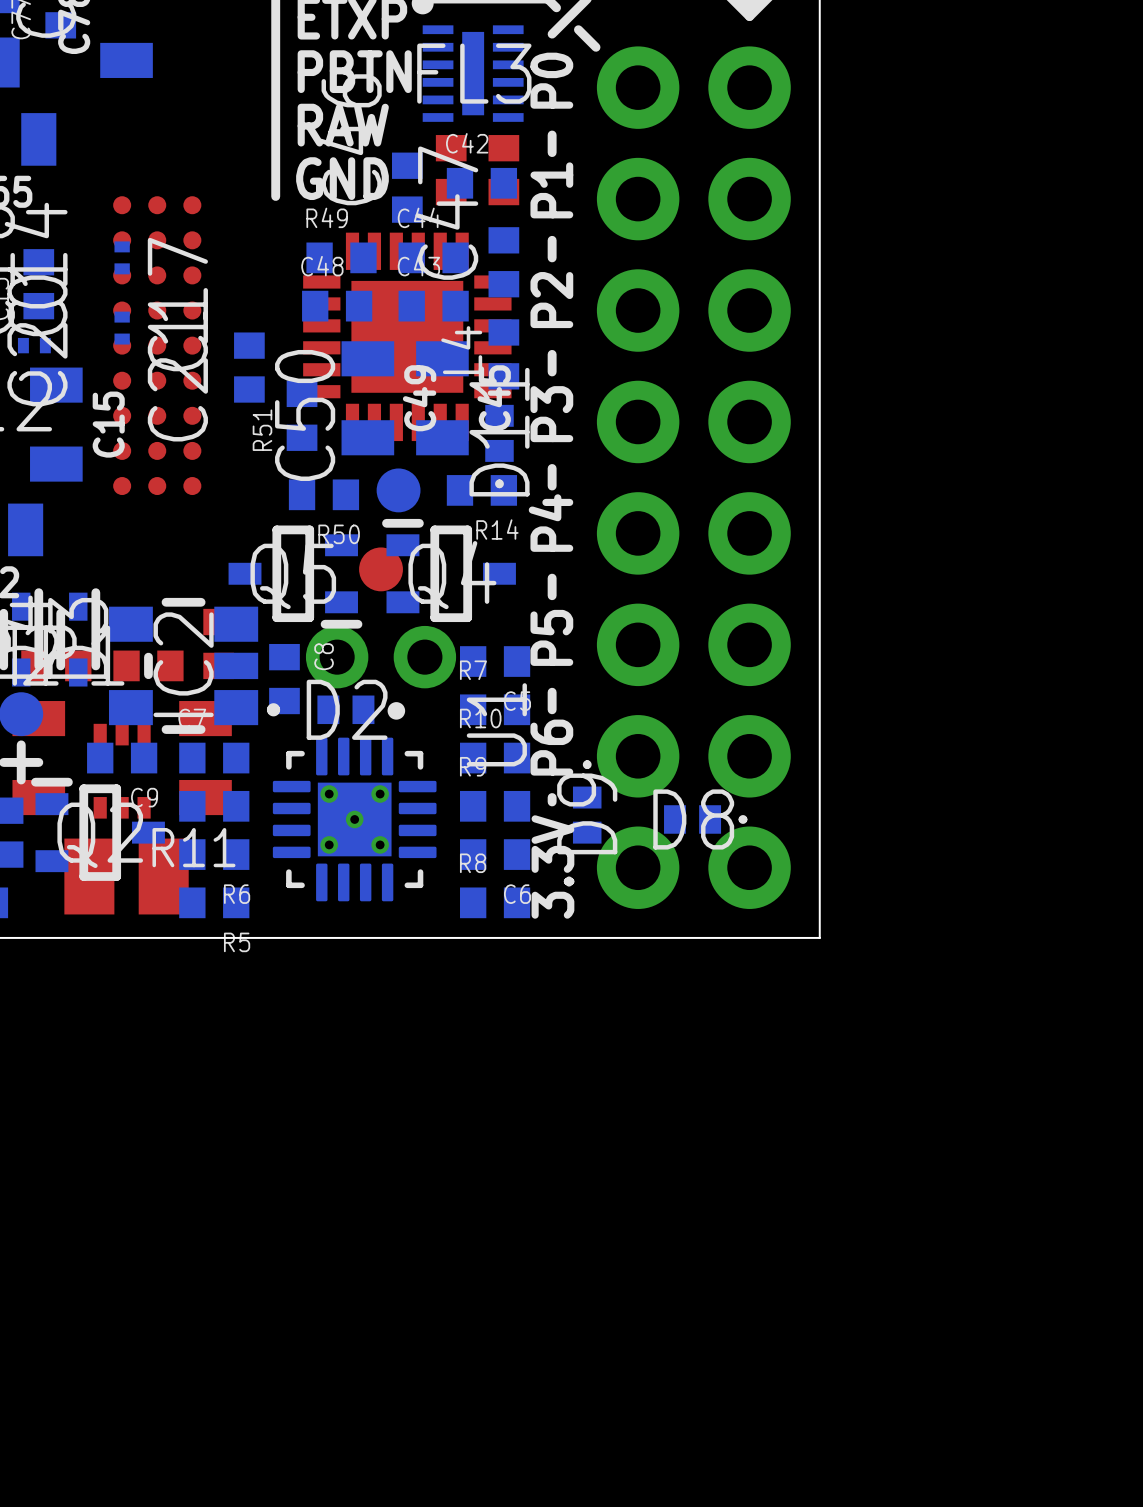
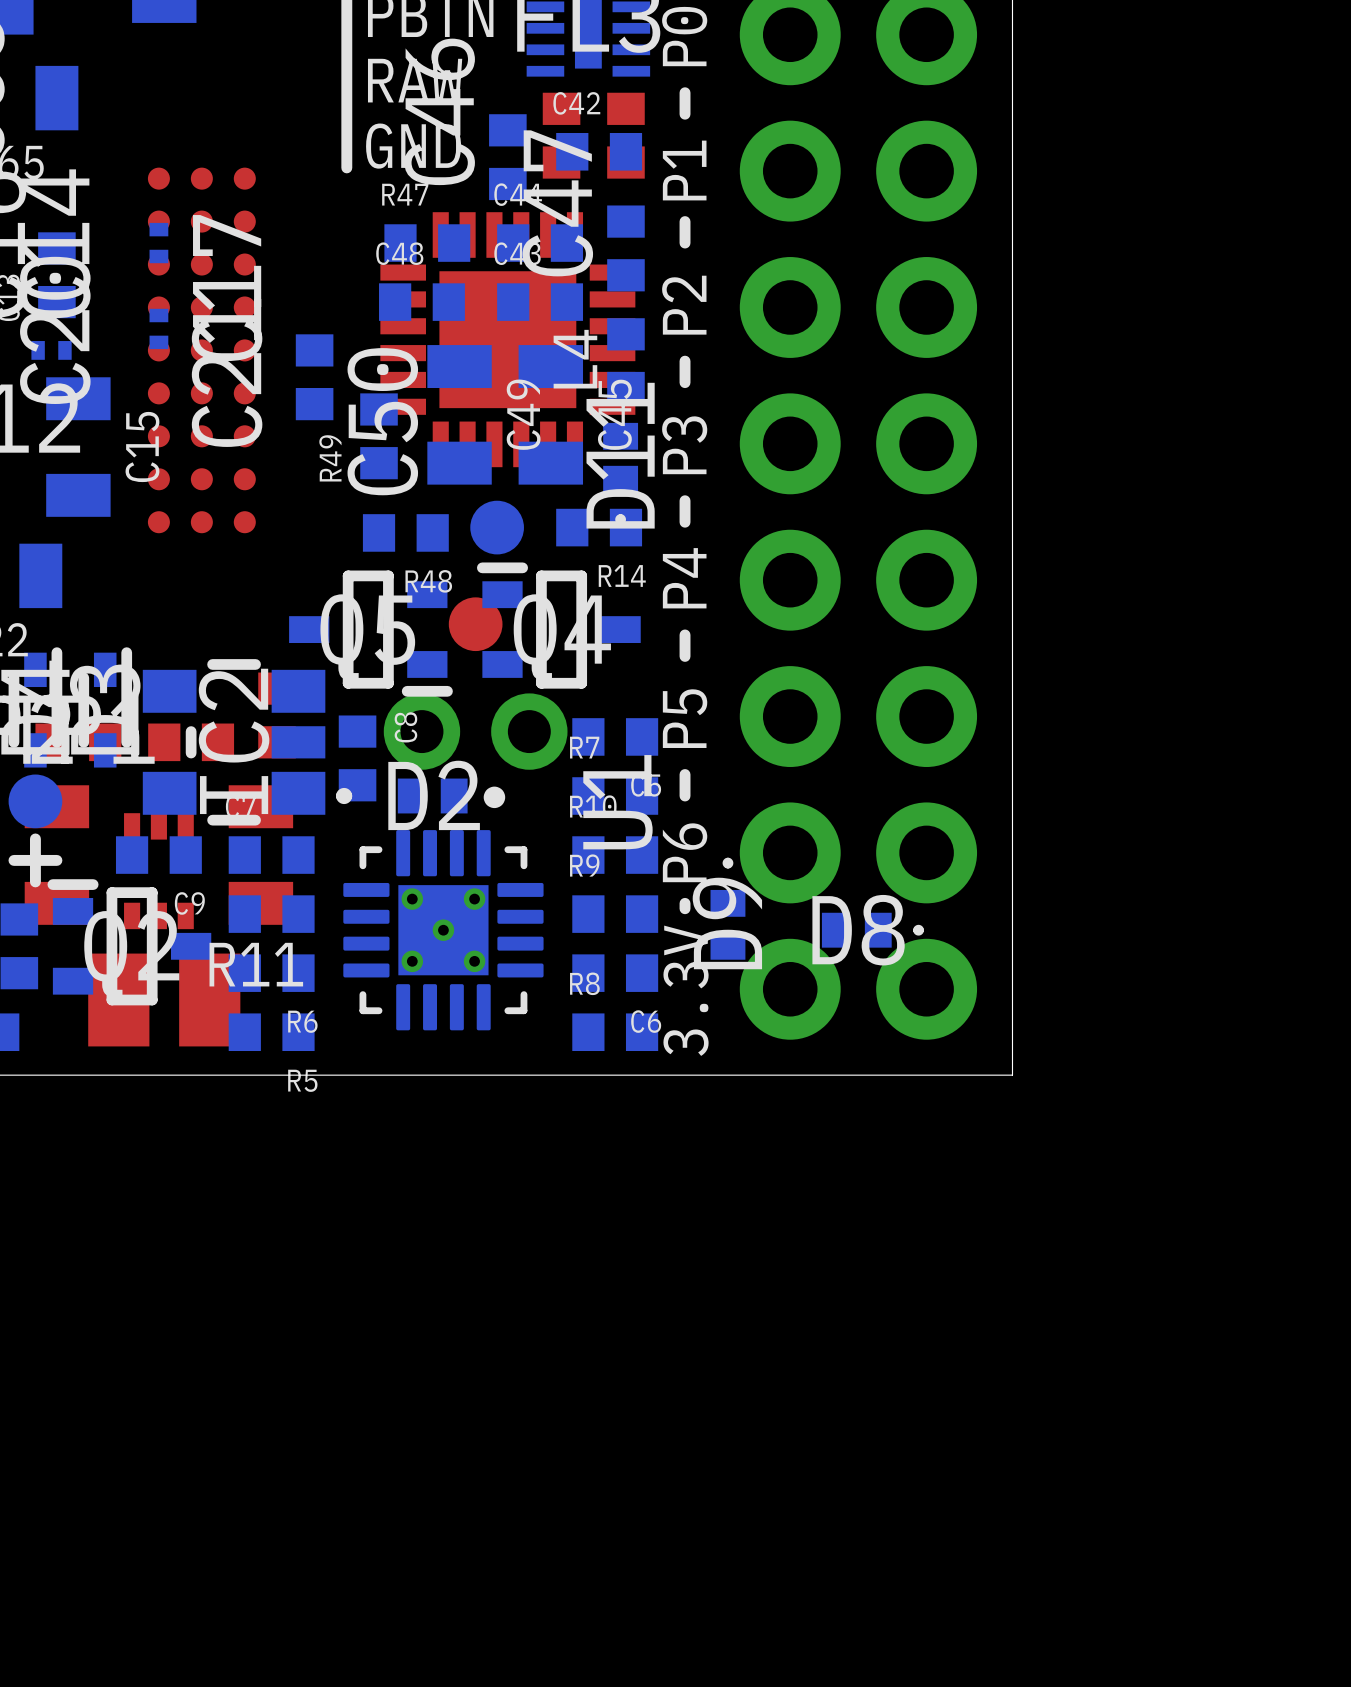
R49 name: R49 (327, 217) -> R47 (405, 194)
R51 name: R51 (262, 430) -> R49 (330, 458)
R50 name: R50 (339, 534) -> R48 (428, 581)

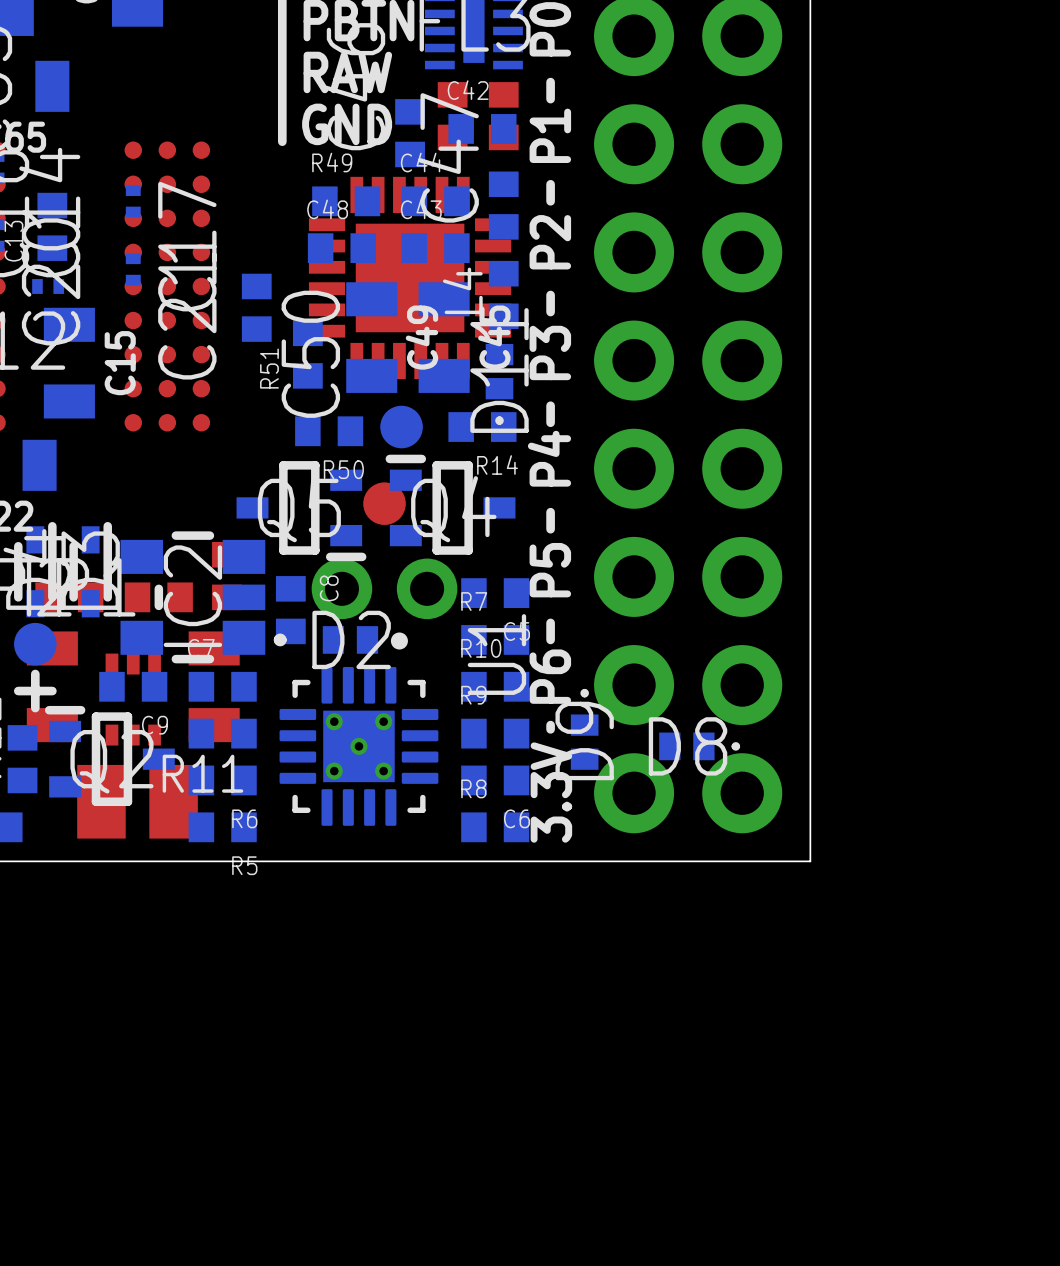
R47 name: R47 (405, 194) -> R49 (332, 162)
R49 name: R49 (330, 458) -> R51 (269, 368)
R48 name: R48 (428, 581) -> R50 (343, 469)

